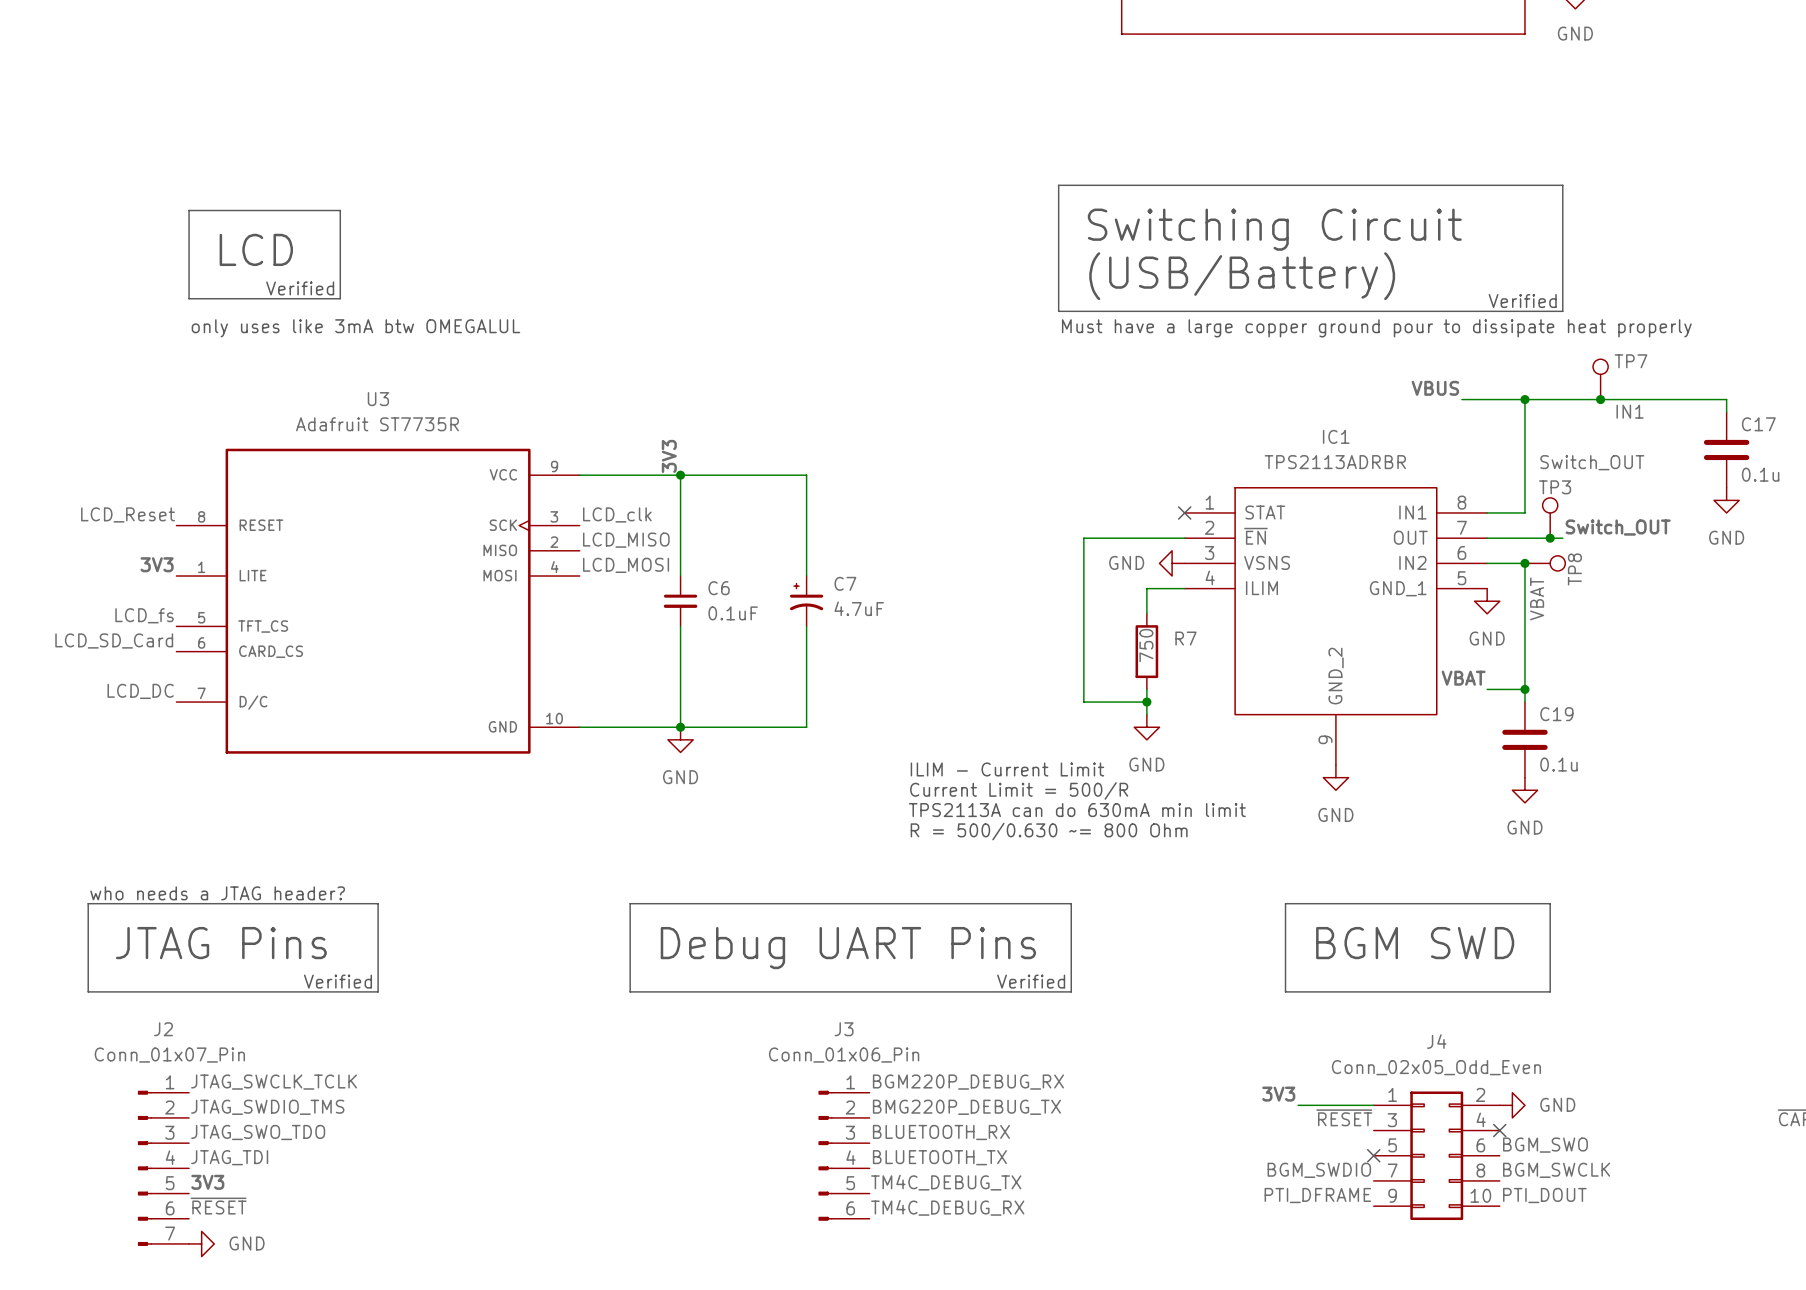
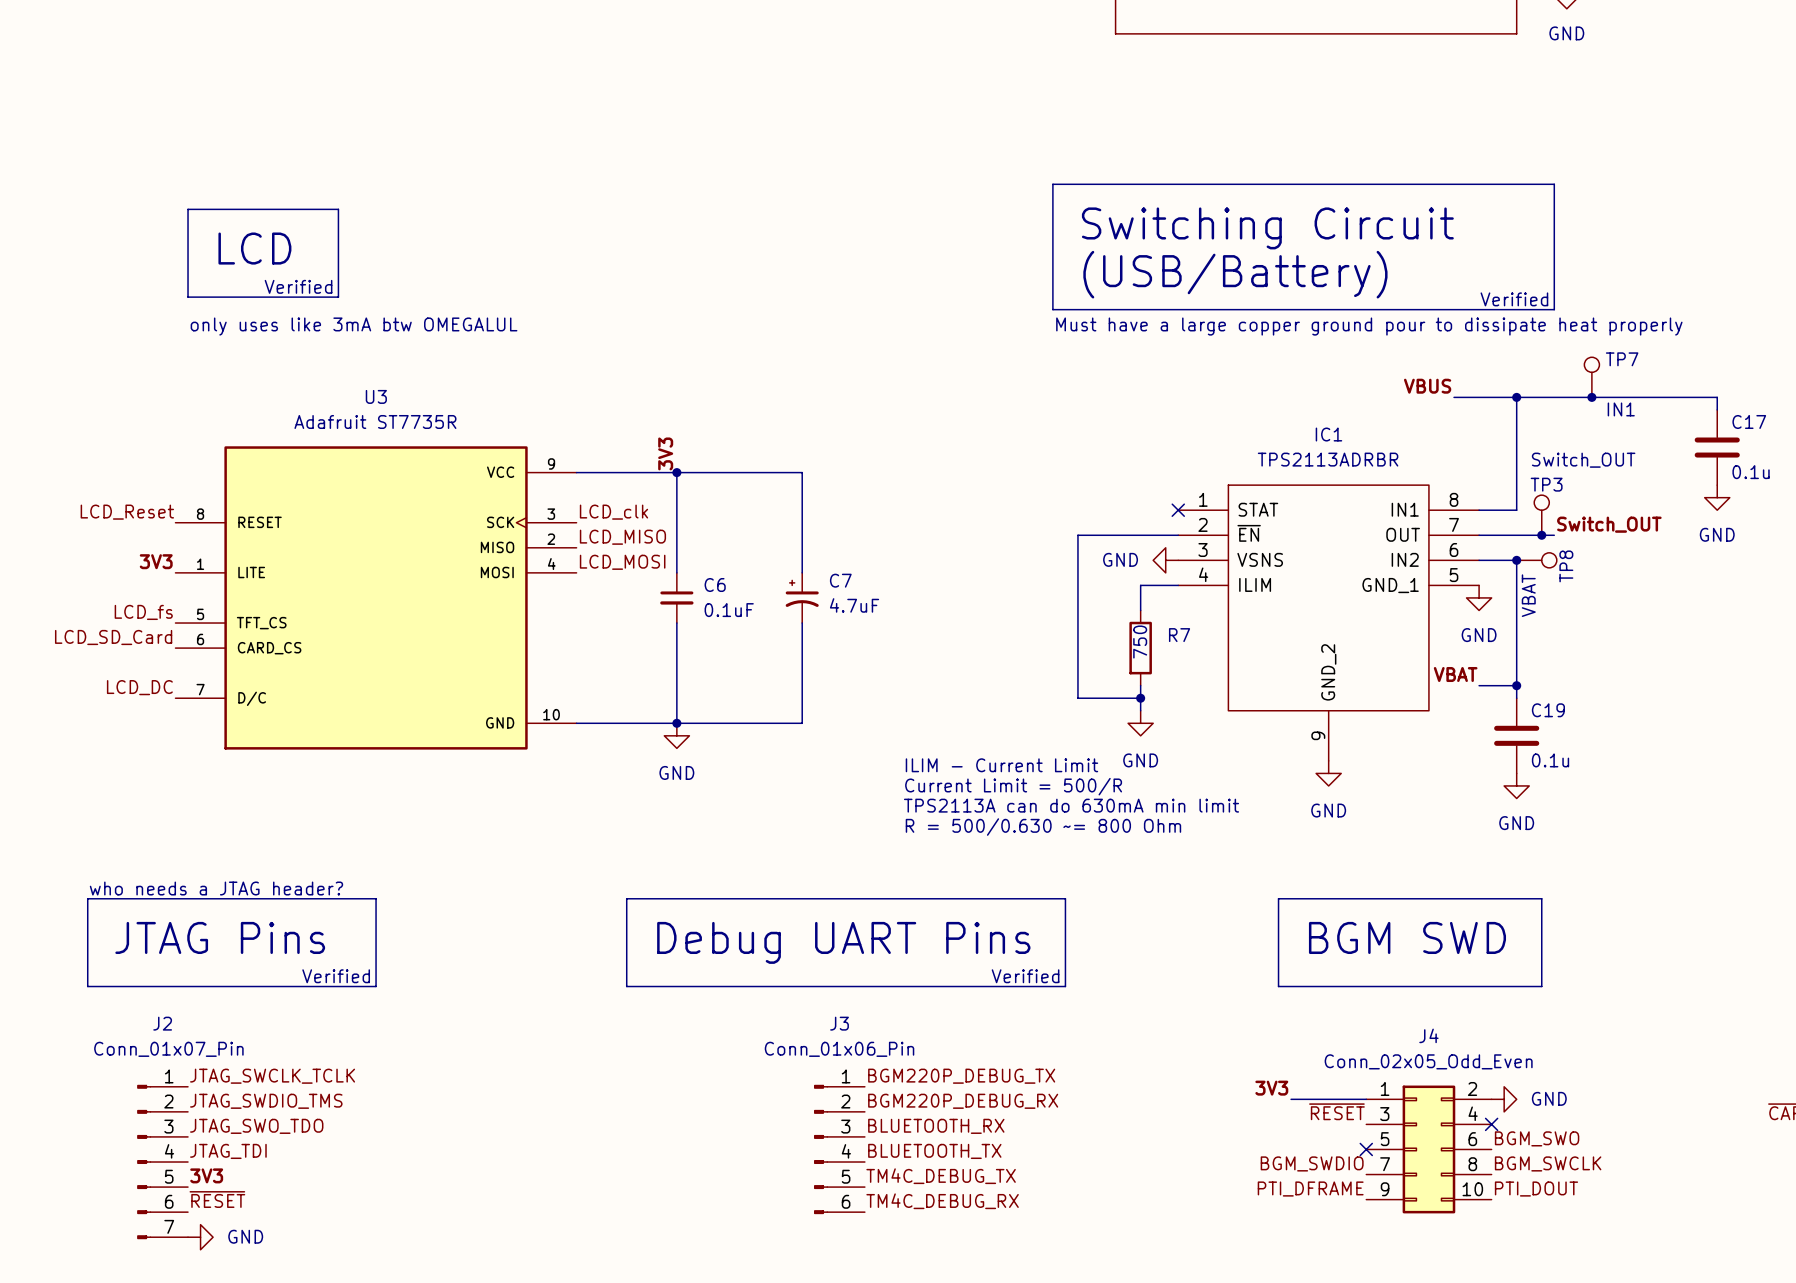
label: BGM220P_DEBUG_RX (968, 1082) -> BGM220P_DEBUG_TX (961, 1076)
label: BMG220P_DEBUG_TX (966, 1107) -> BGM220P_DEBUG_RX (963, 1101)

